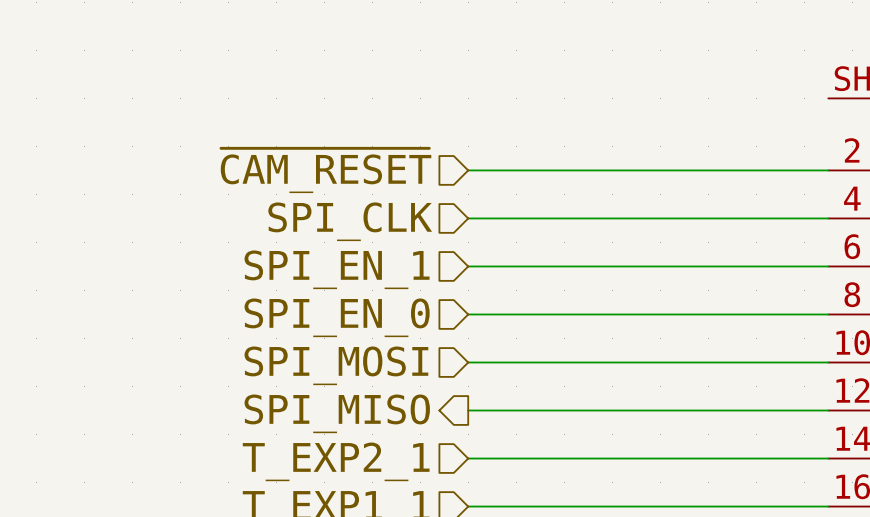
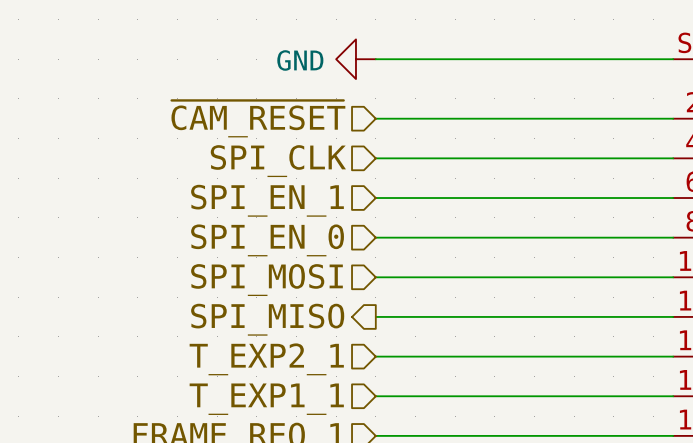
power symbol: none -> GND (355, 59)
wire: none -> (375, 59) (673, 59)

